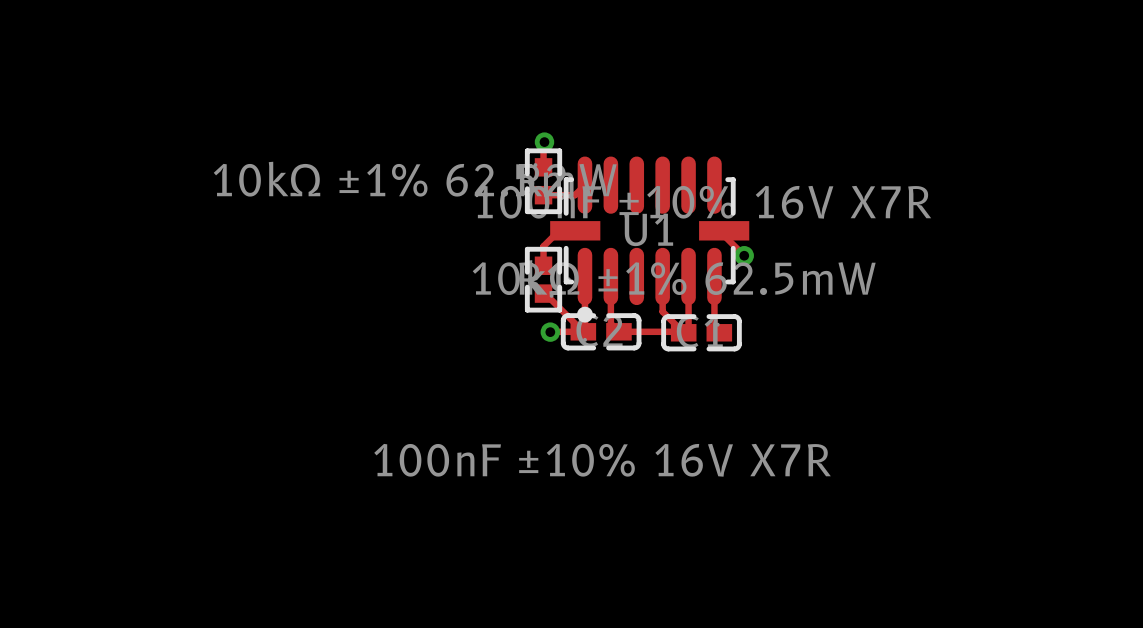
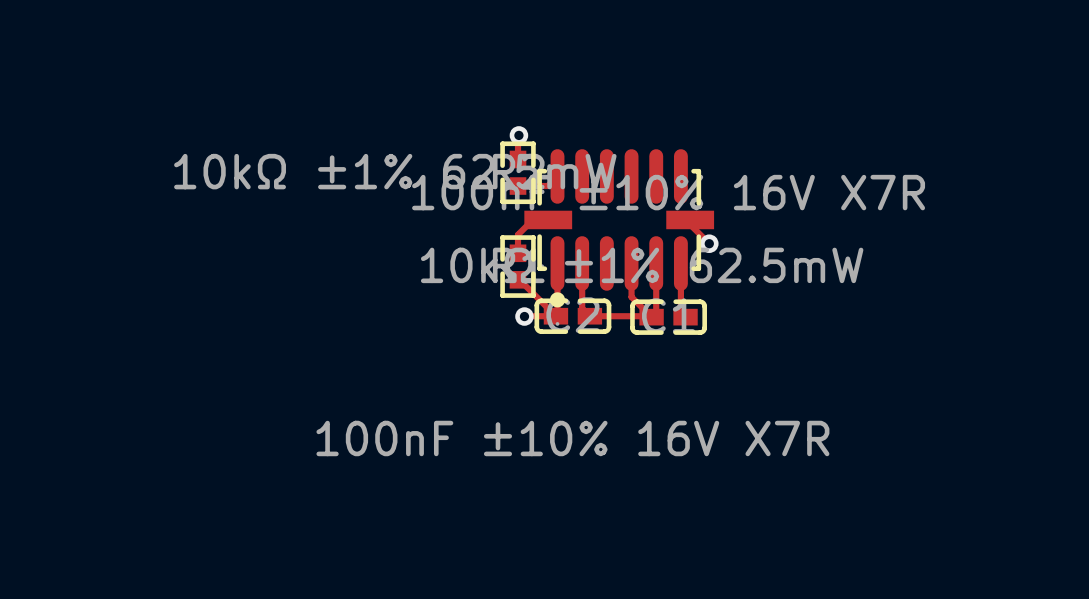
U1 name: U1 (648, 229) -> none

